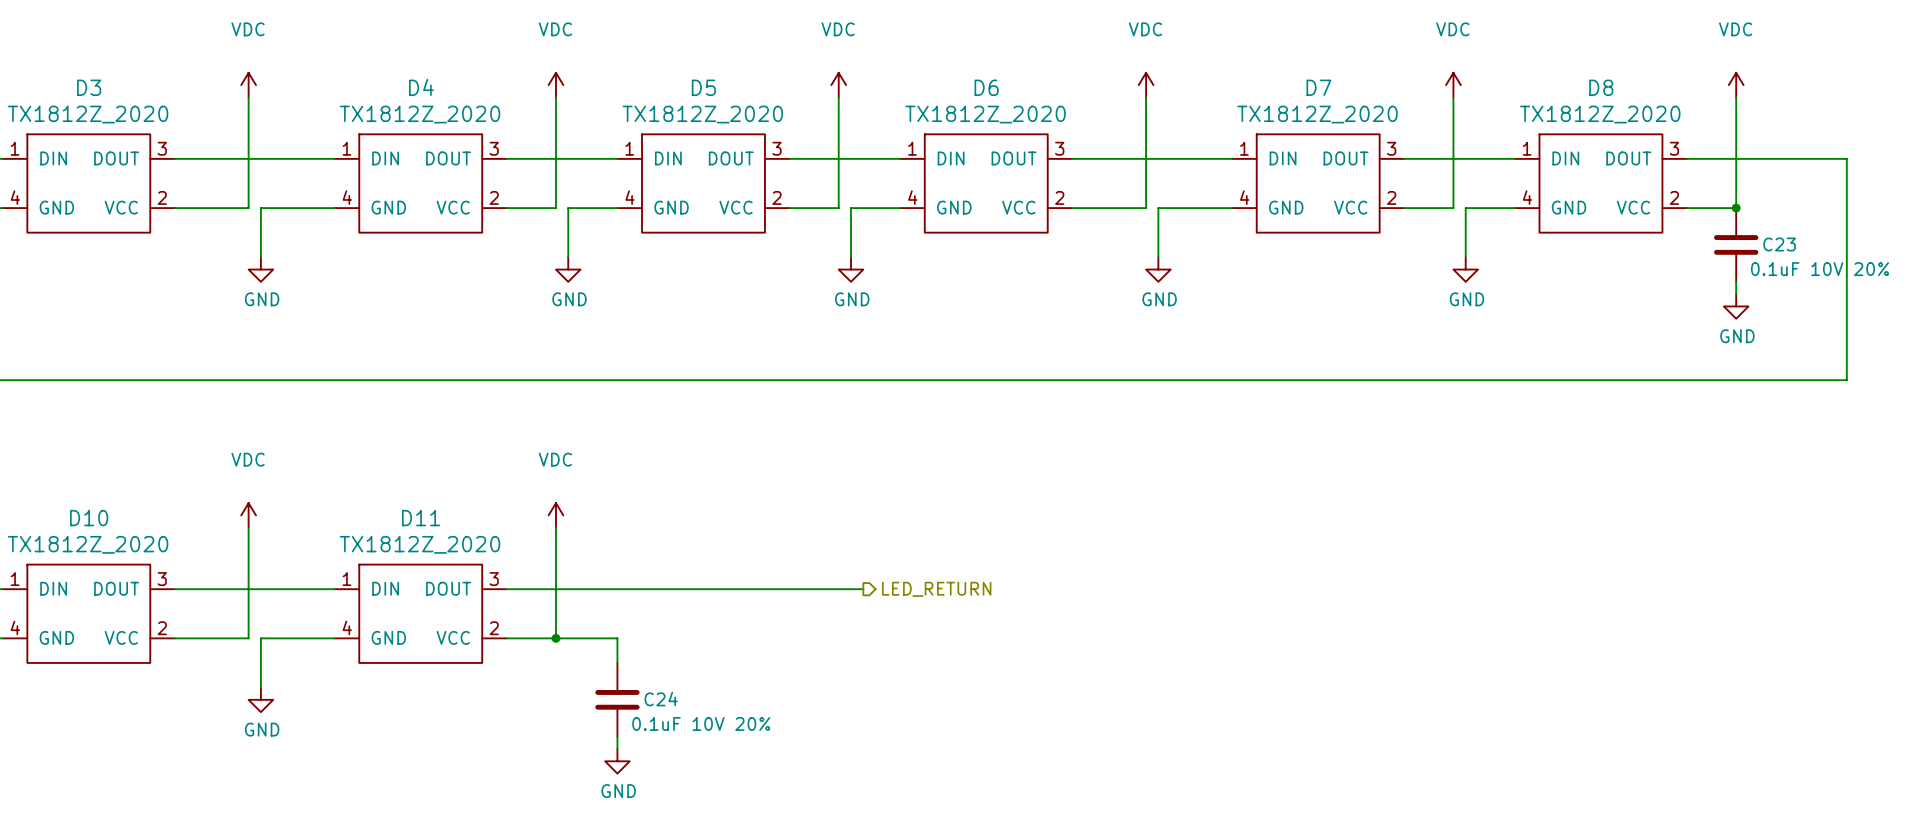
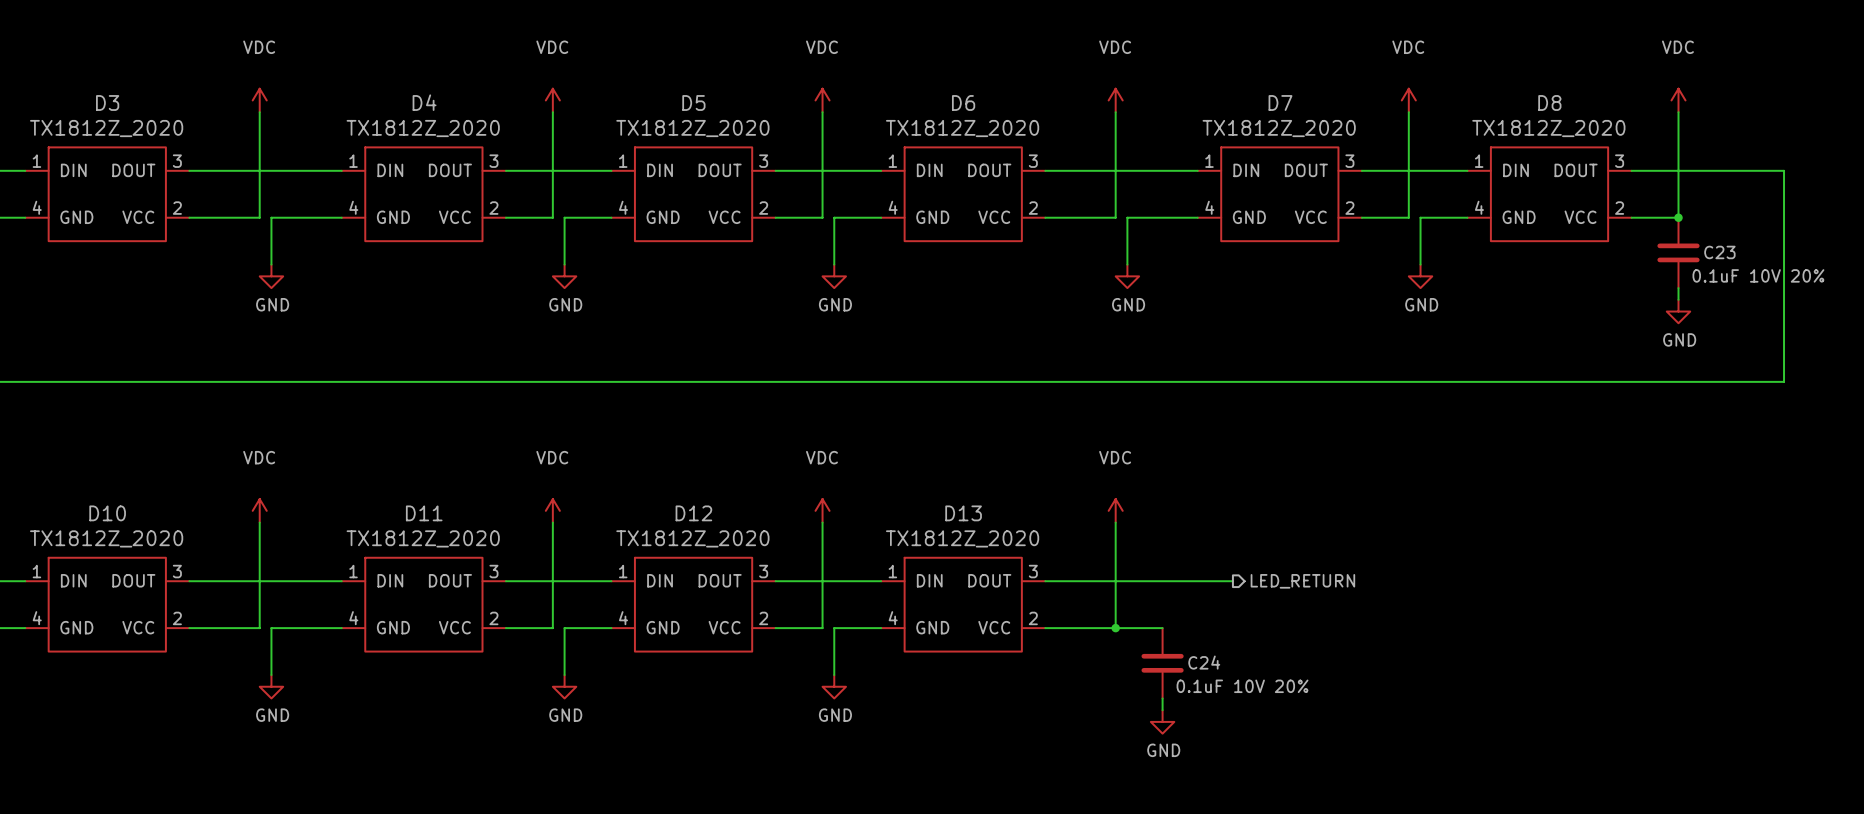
power symbol: none -> VDC (822, 510)
power symbol: none -> VDC (1115, 510)
wire: none -> (822, 522) (822, 628) (775, 628)
wire: none -> (1115, 522) (1115, 628)
wire: (617, 589) (789, 589) -> none
wire: none -> (845, 581) (881, 581)
hierarchical label: LED_RETURN (936, 589) -> none
wire: none -> (1045, 581) (1232, 581)
hierarchical label: none -> LED_RETURN (1302, 581)
D12: none -> TX1812Z_2020 (693, 604)
D13: none -> TX1812Z_2020 (963, 604)
wire: (555, 638) (568, 638) -> (564, 675) (564, 628)
junction: (555, 638) -> none
wire: (617, 638) (617, 662) -> none
wire: none -> (881, 628) (834, 628) (834, 675)
wire: none -> (1045, 628) (1162, 628)
junction: none -> (1115, 628)
C24 position: (617, 699) -> (1162, 663)
power symbol: none -> GND (834, 686)
wire: none -> (1162, 698) (1162, 710)
wire: (617, 736) (617, 749) -> none
power symbol: none -> GND (1162, 721)
power symbol position: GND (617, 761) -> GND (564, 686)

